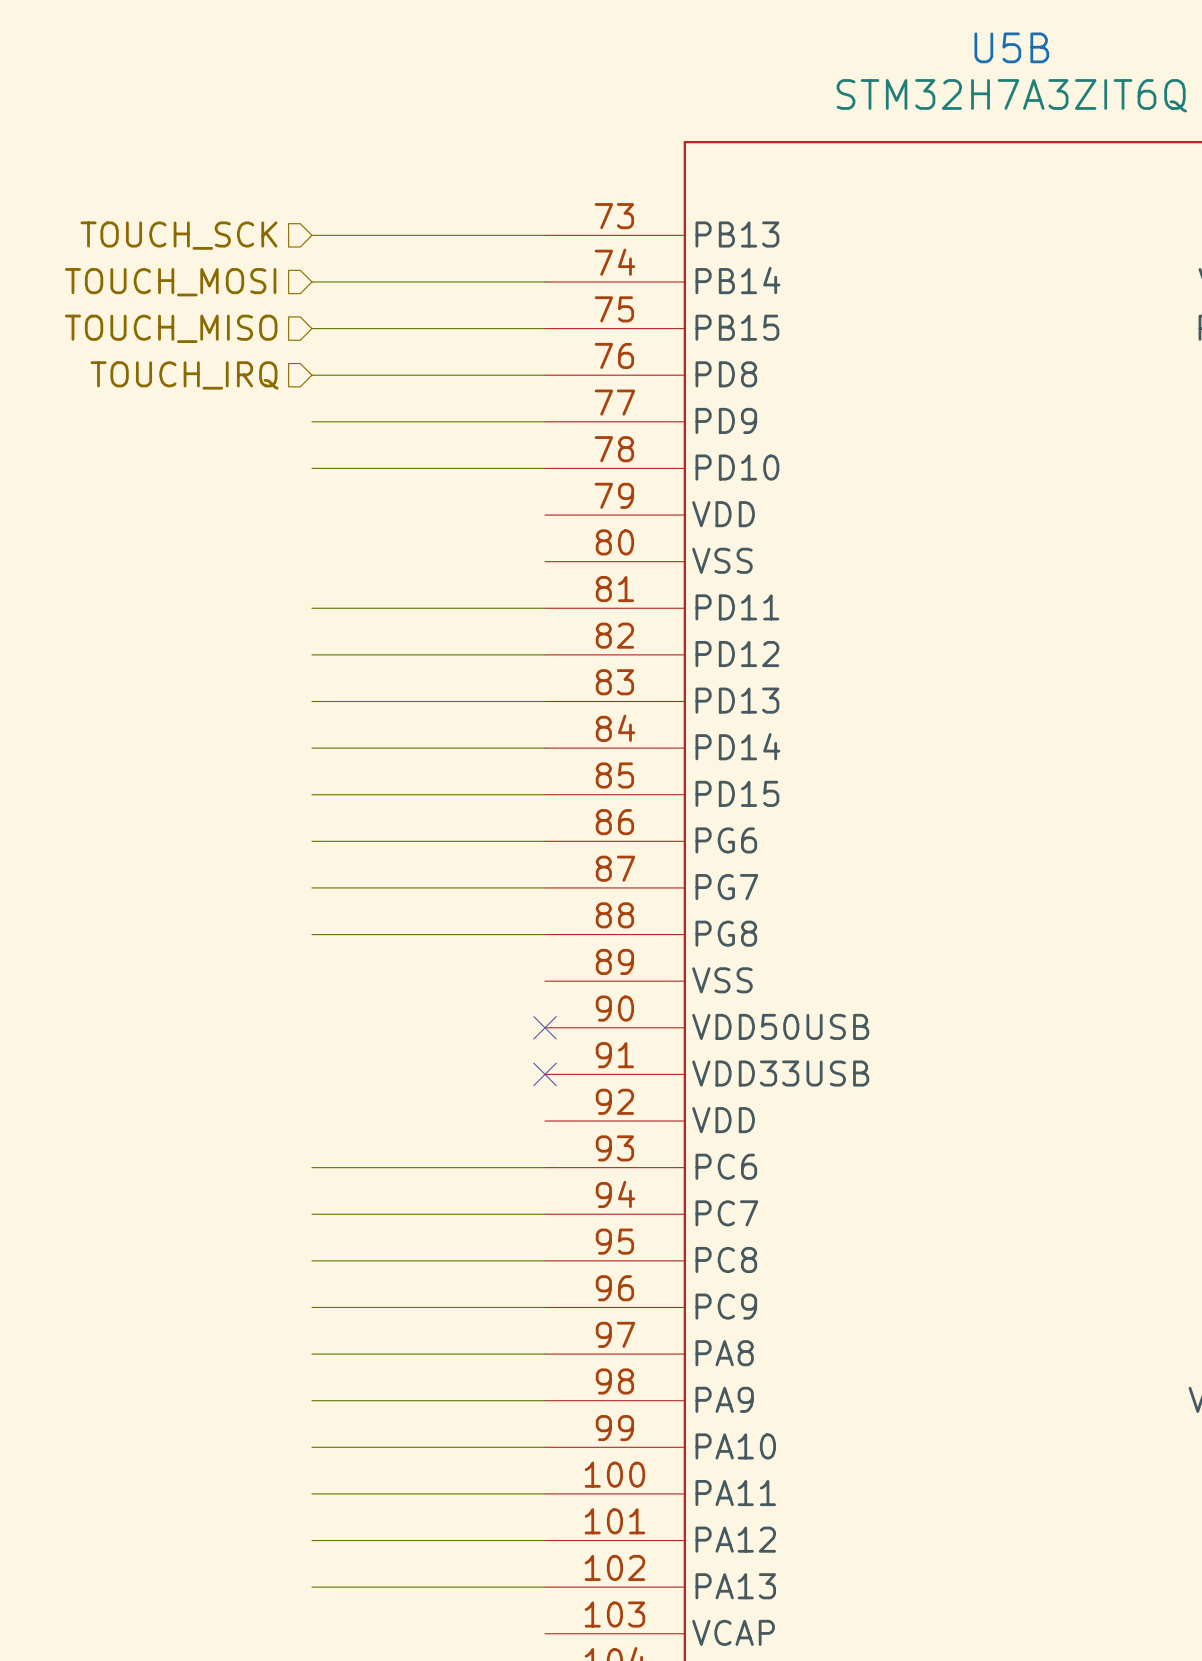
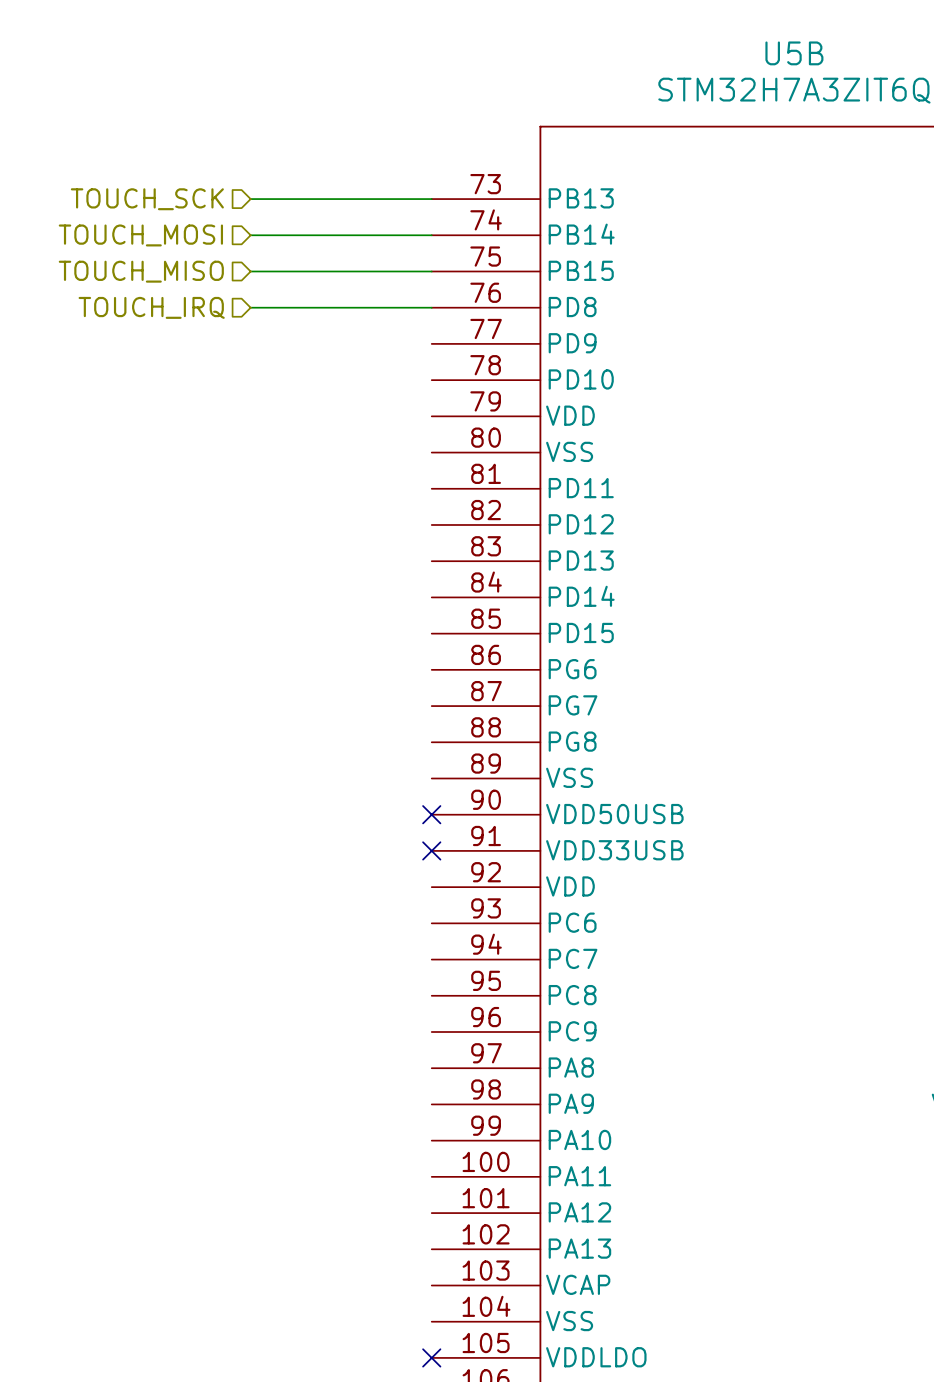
wire: (311, 421) (545, 421) -> none
wire: (311, 468) (545, 468) -> none
wire: (311, 608) (545, 608) -> none
wire: (311, 654) (545, 654) -> none
wire: (311, 701) (545, 701) -> none
wire: (311, 748) (545, 748) -> none
wire: (311, 794) (545, 794) -> none
wire: (311, 841) (545, 841) -> none
wire: (311, 887) (545, 887) -> none
wire: (311, 934) (545, 934) -> none
wire: (311, 1167) (545, 1167) -> none
wire: (311, 1214) (545, 1214) -> none
wire: (311, 1260) (545, 1260) -> none
wire: (311, 1307) (545, 1307) -> none
wire: (311, 1354) (545, 1354) -> none
wire: (311, 1400) (545, 1400) -> none
wire: (311, 1447) (545, 1447) -> none
wire: (311, 1493) (545, 1493) -> none
wire: (311, 1540) (545, 1540) -> none
wire: (311, 1587) (545, 1587) -> none

